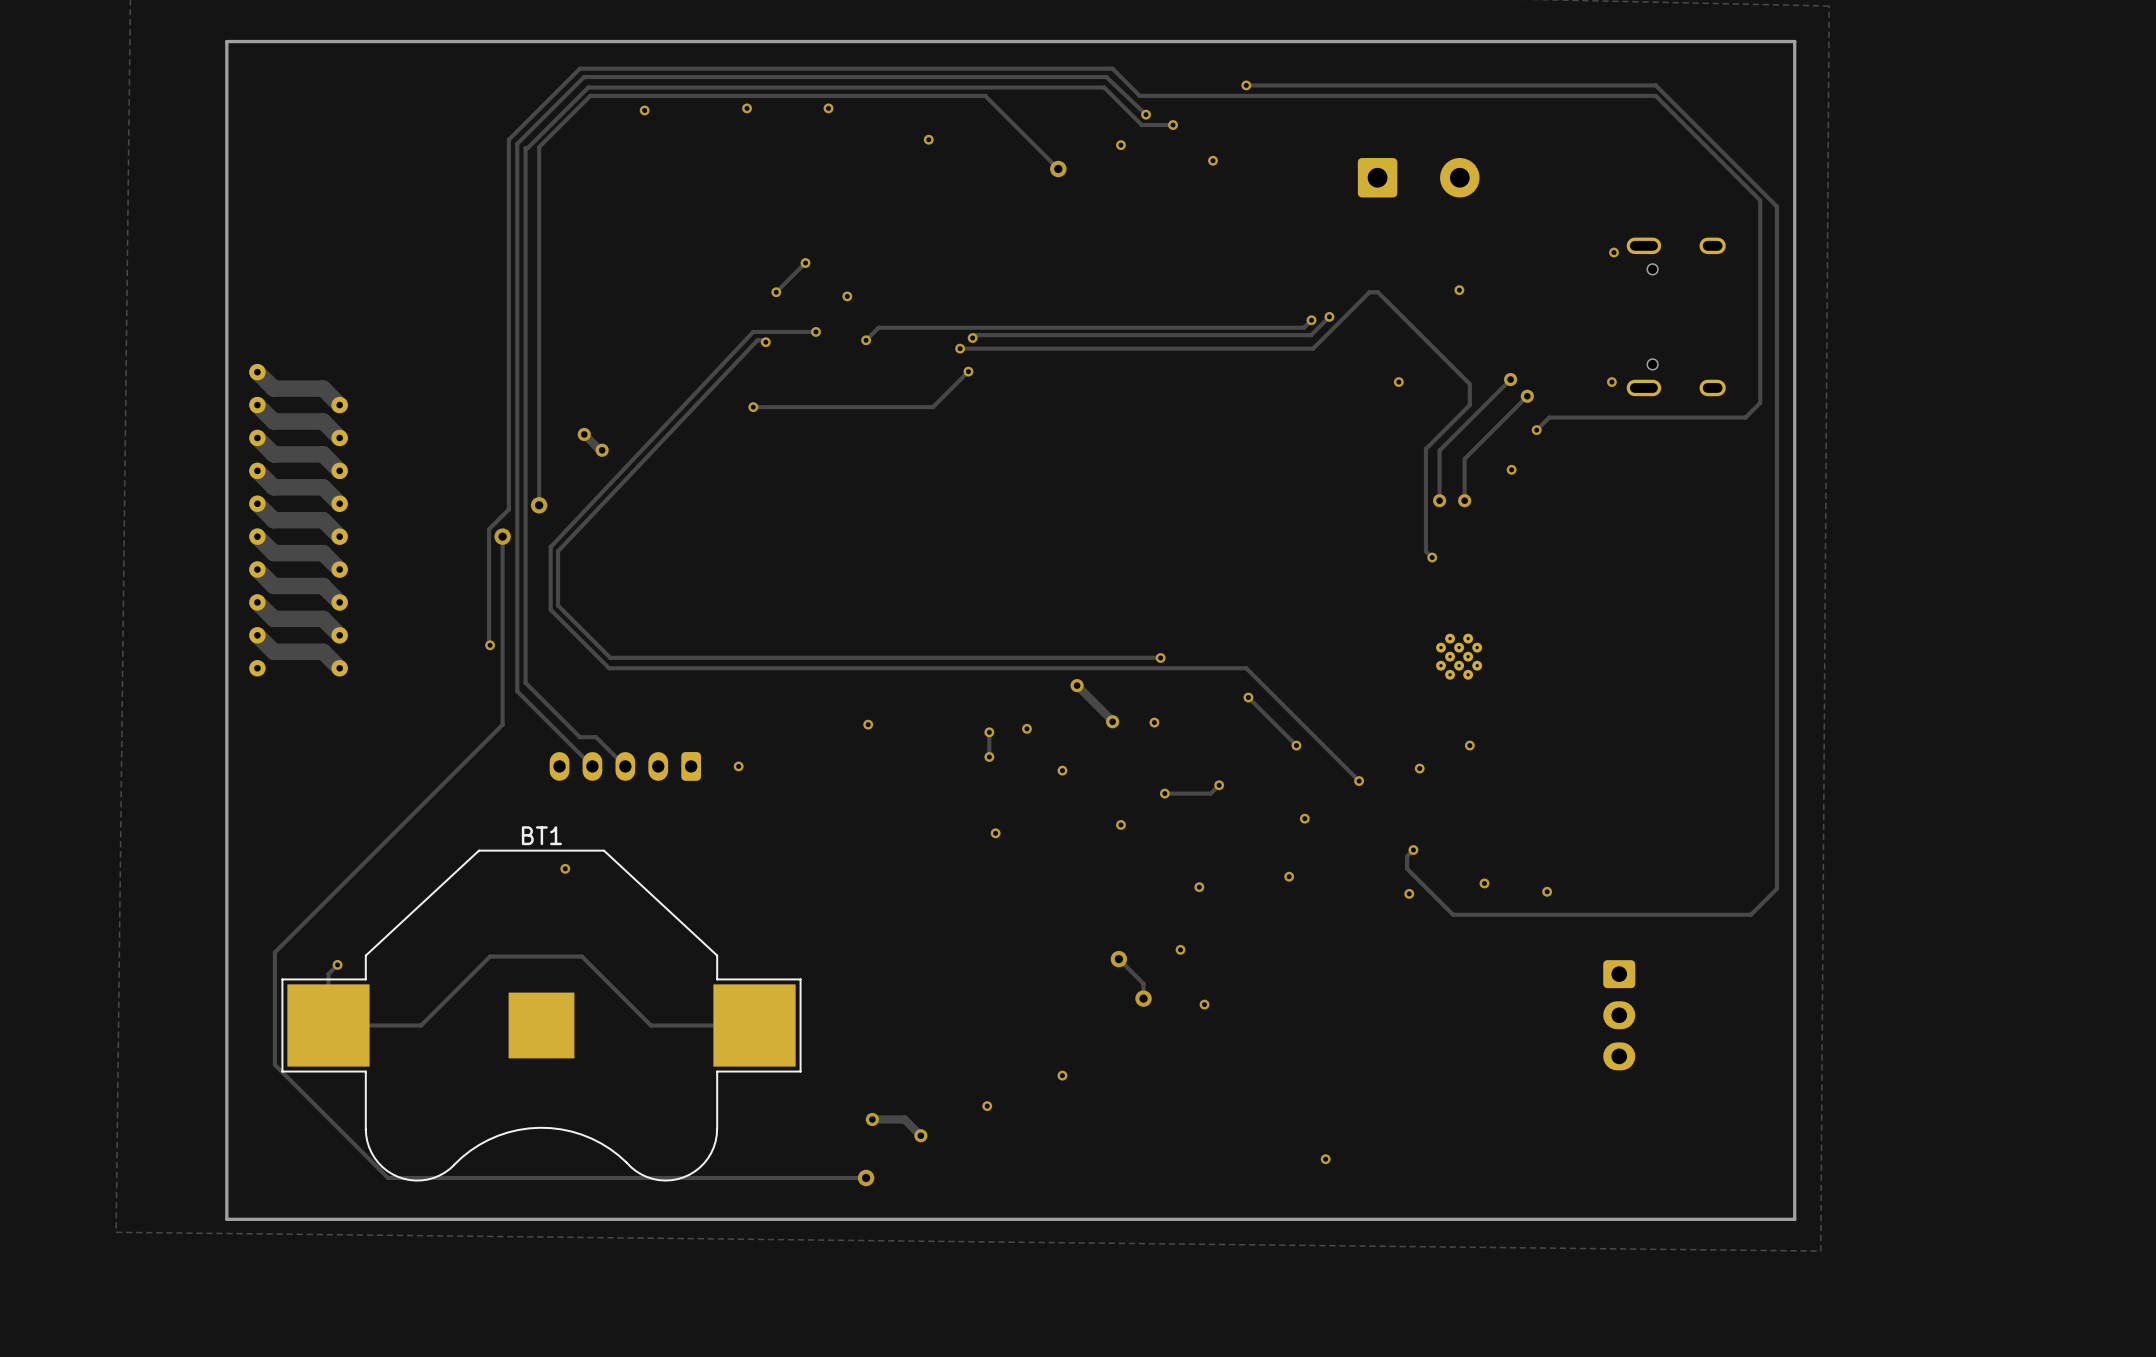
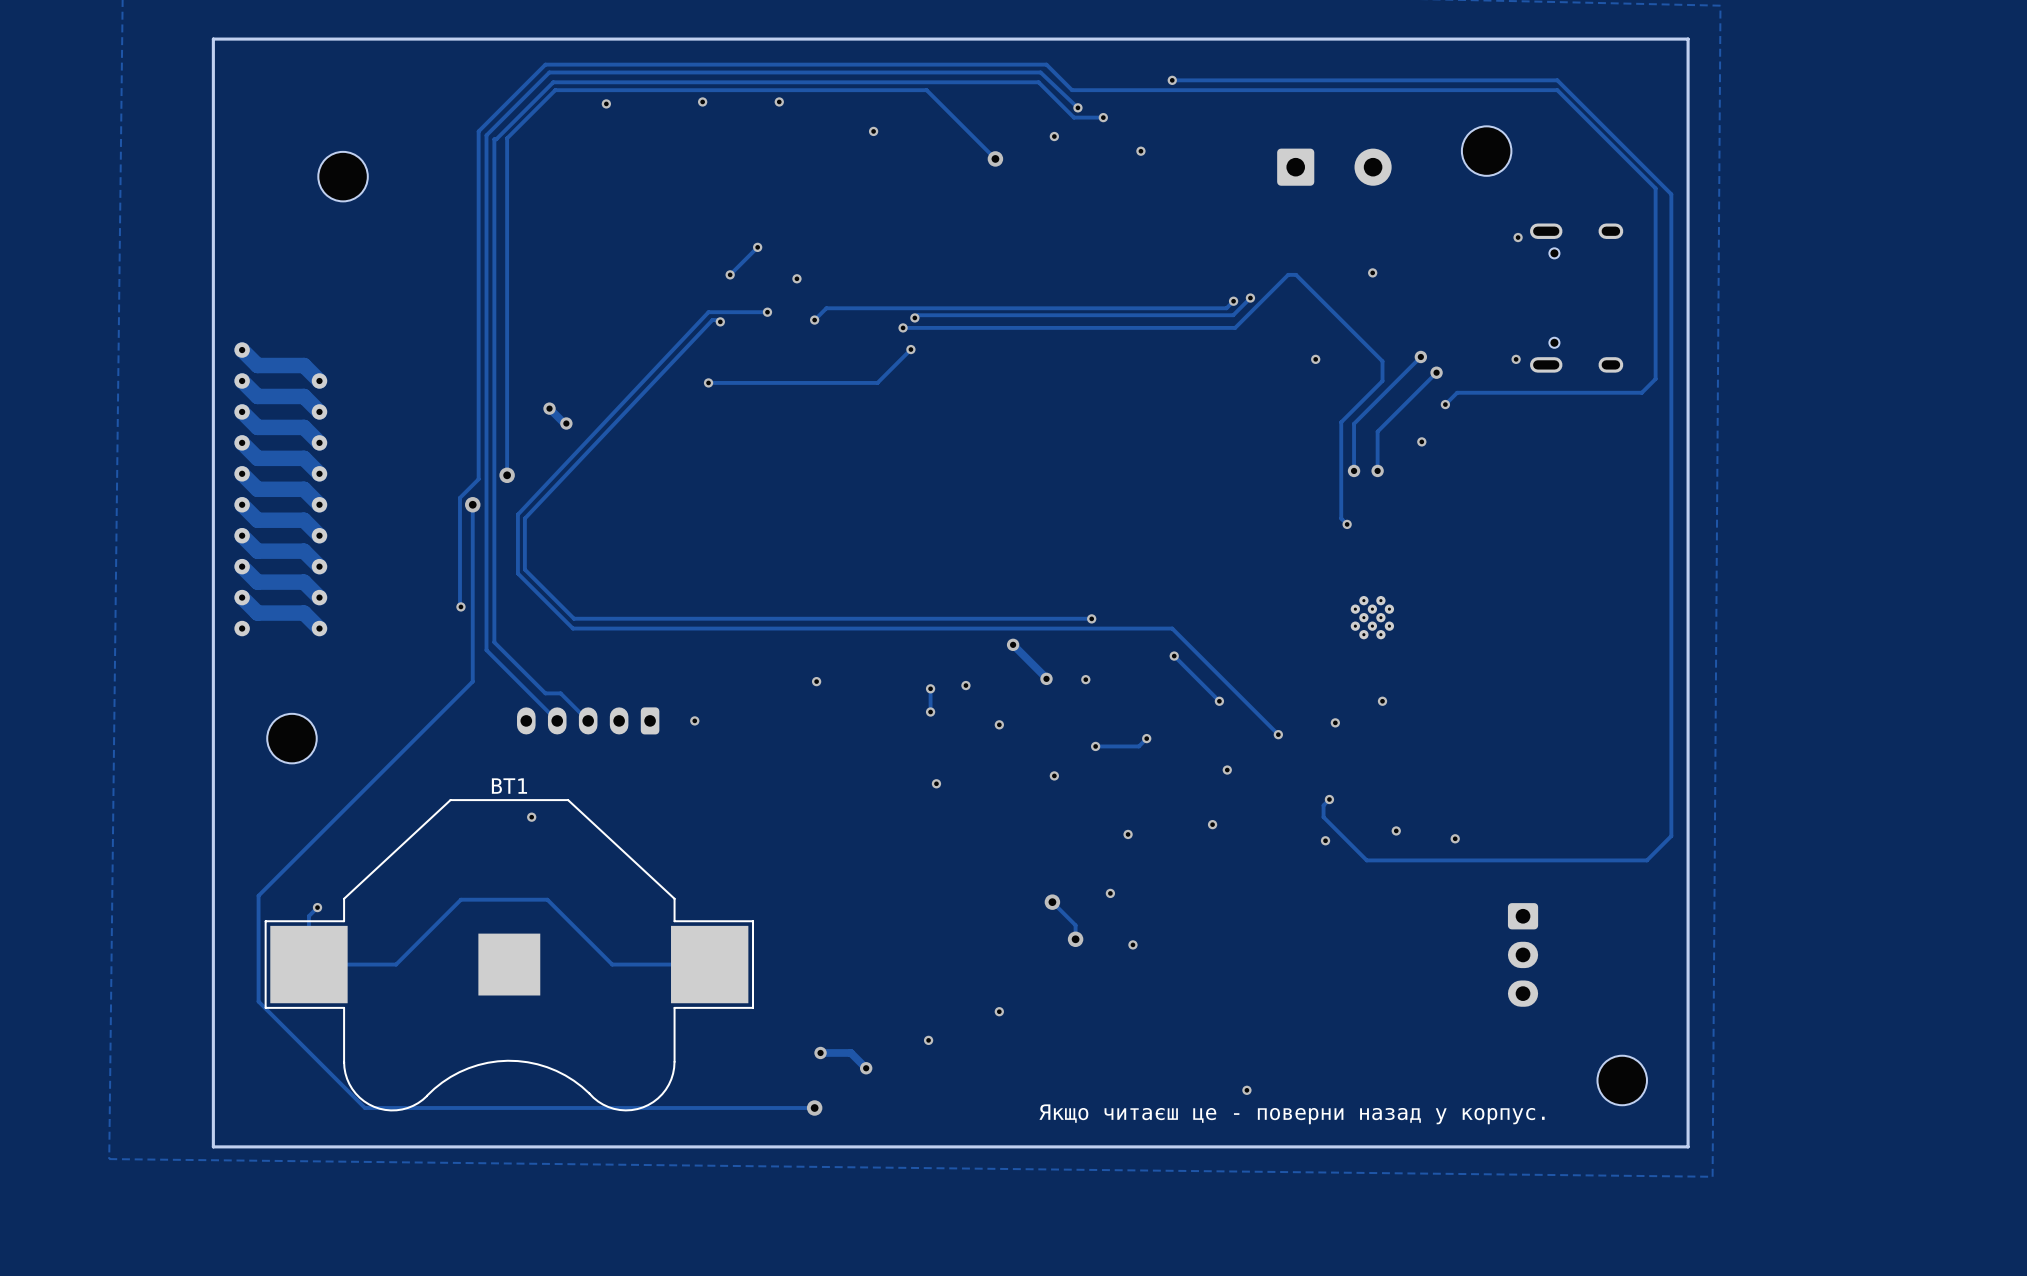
part: none -> (1486, 151)
part: none -> (343, 176)
part: none -> (291, 738)
part: none -> (1622, 1080)
text: none -> Якщо читаєш це - поверни назад у корпус. (1292, 1114)

